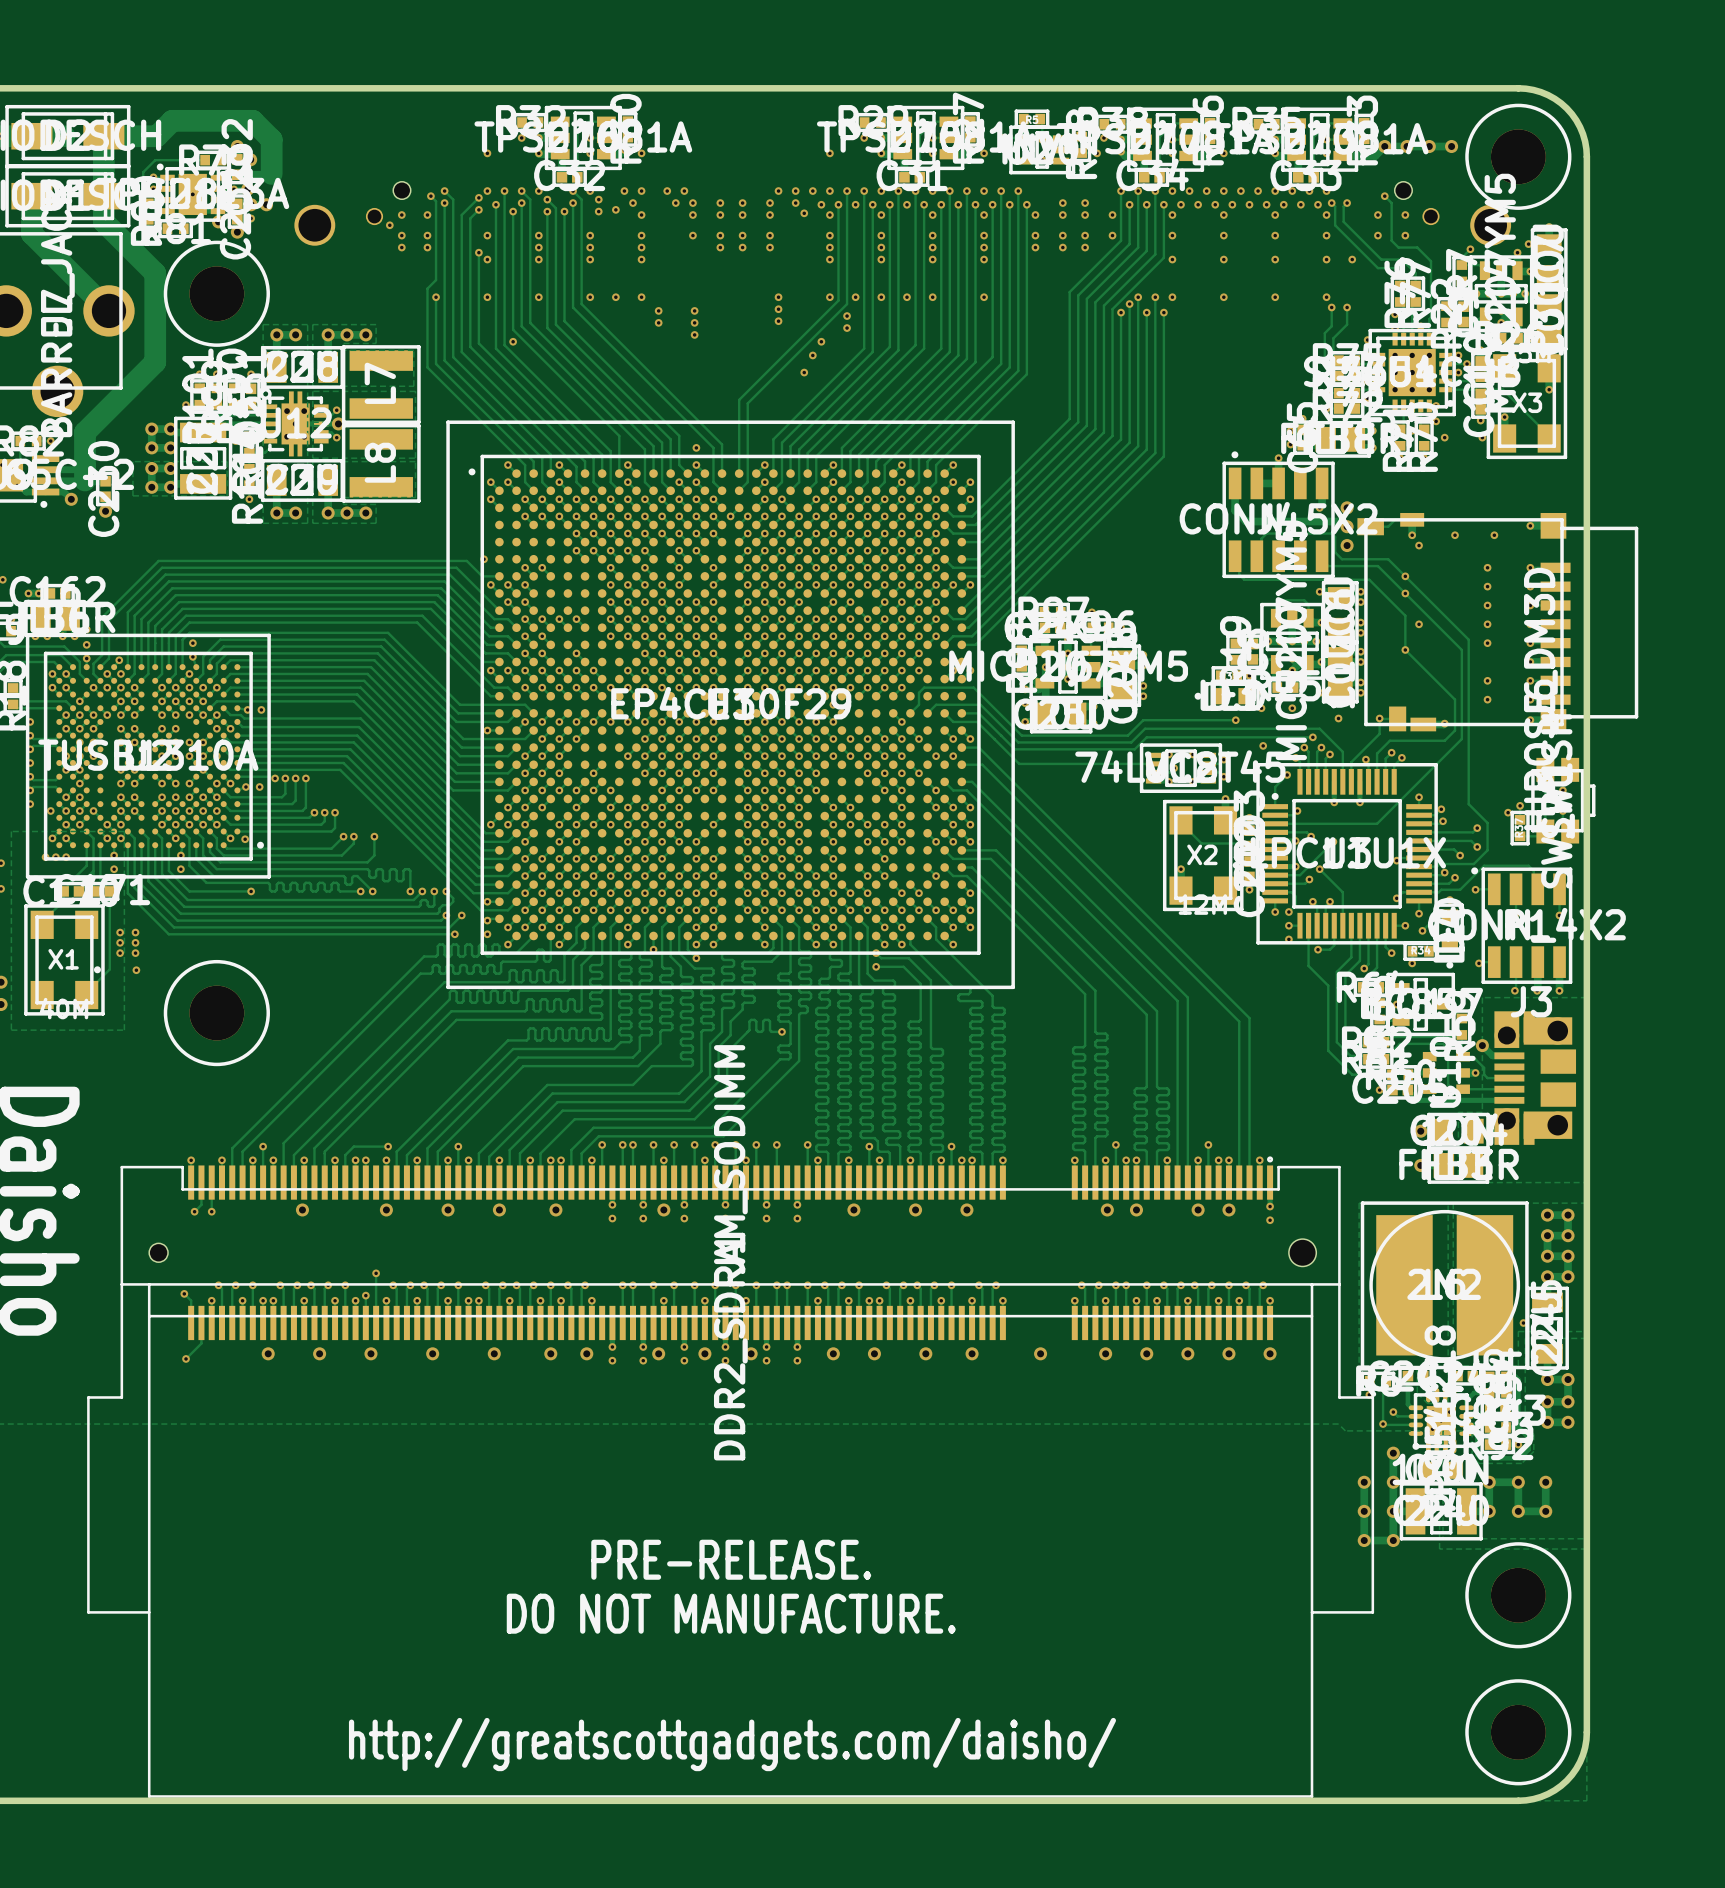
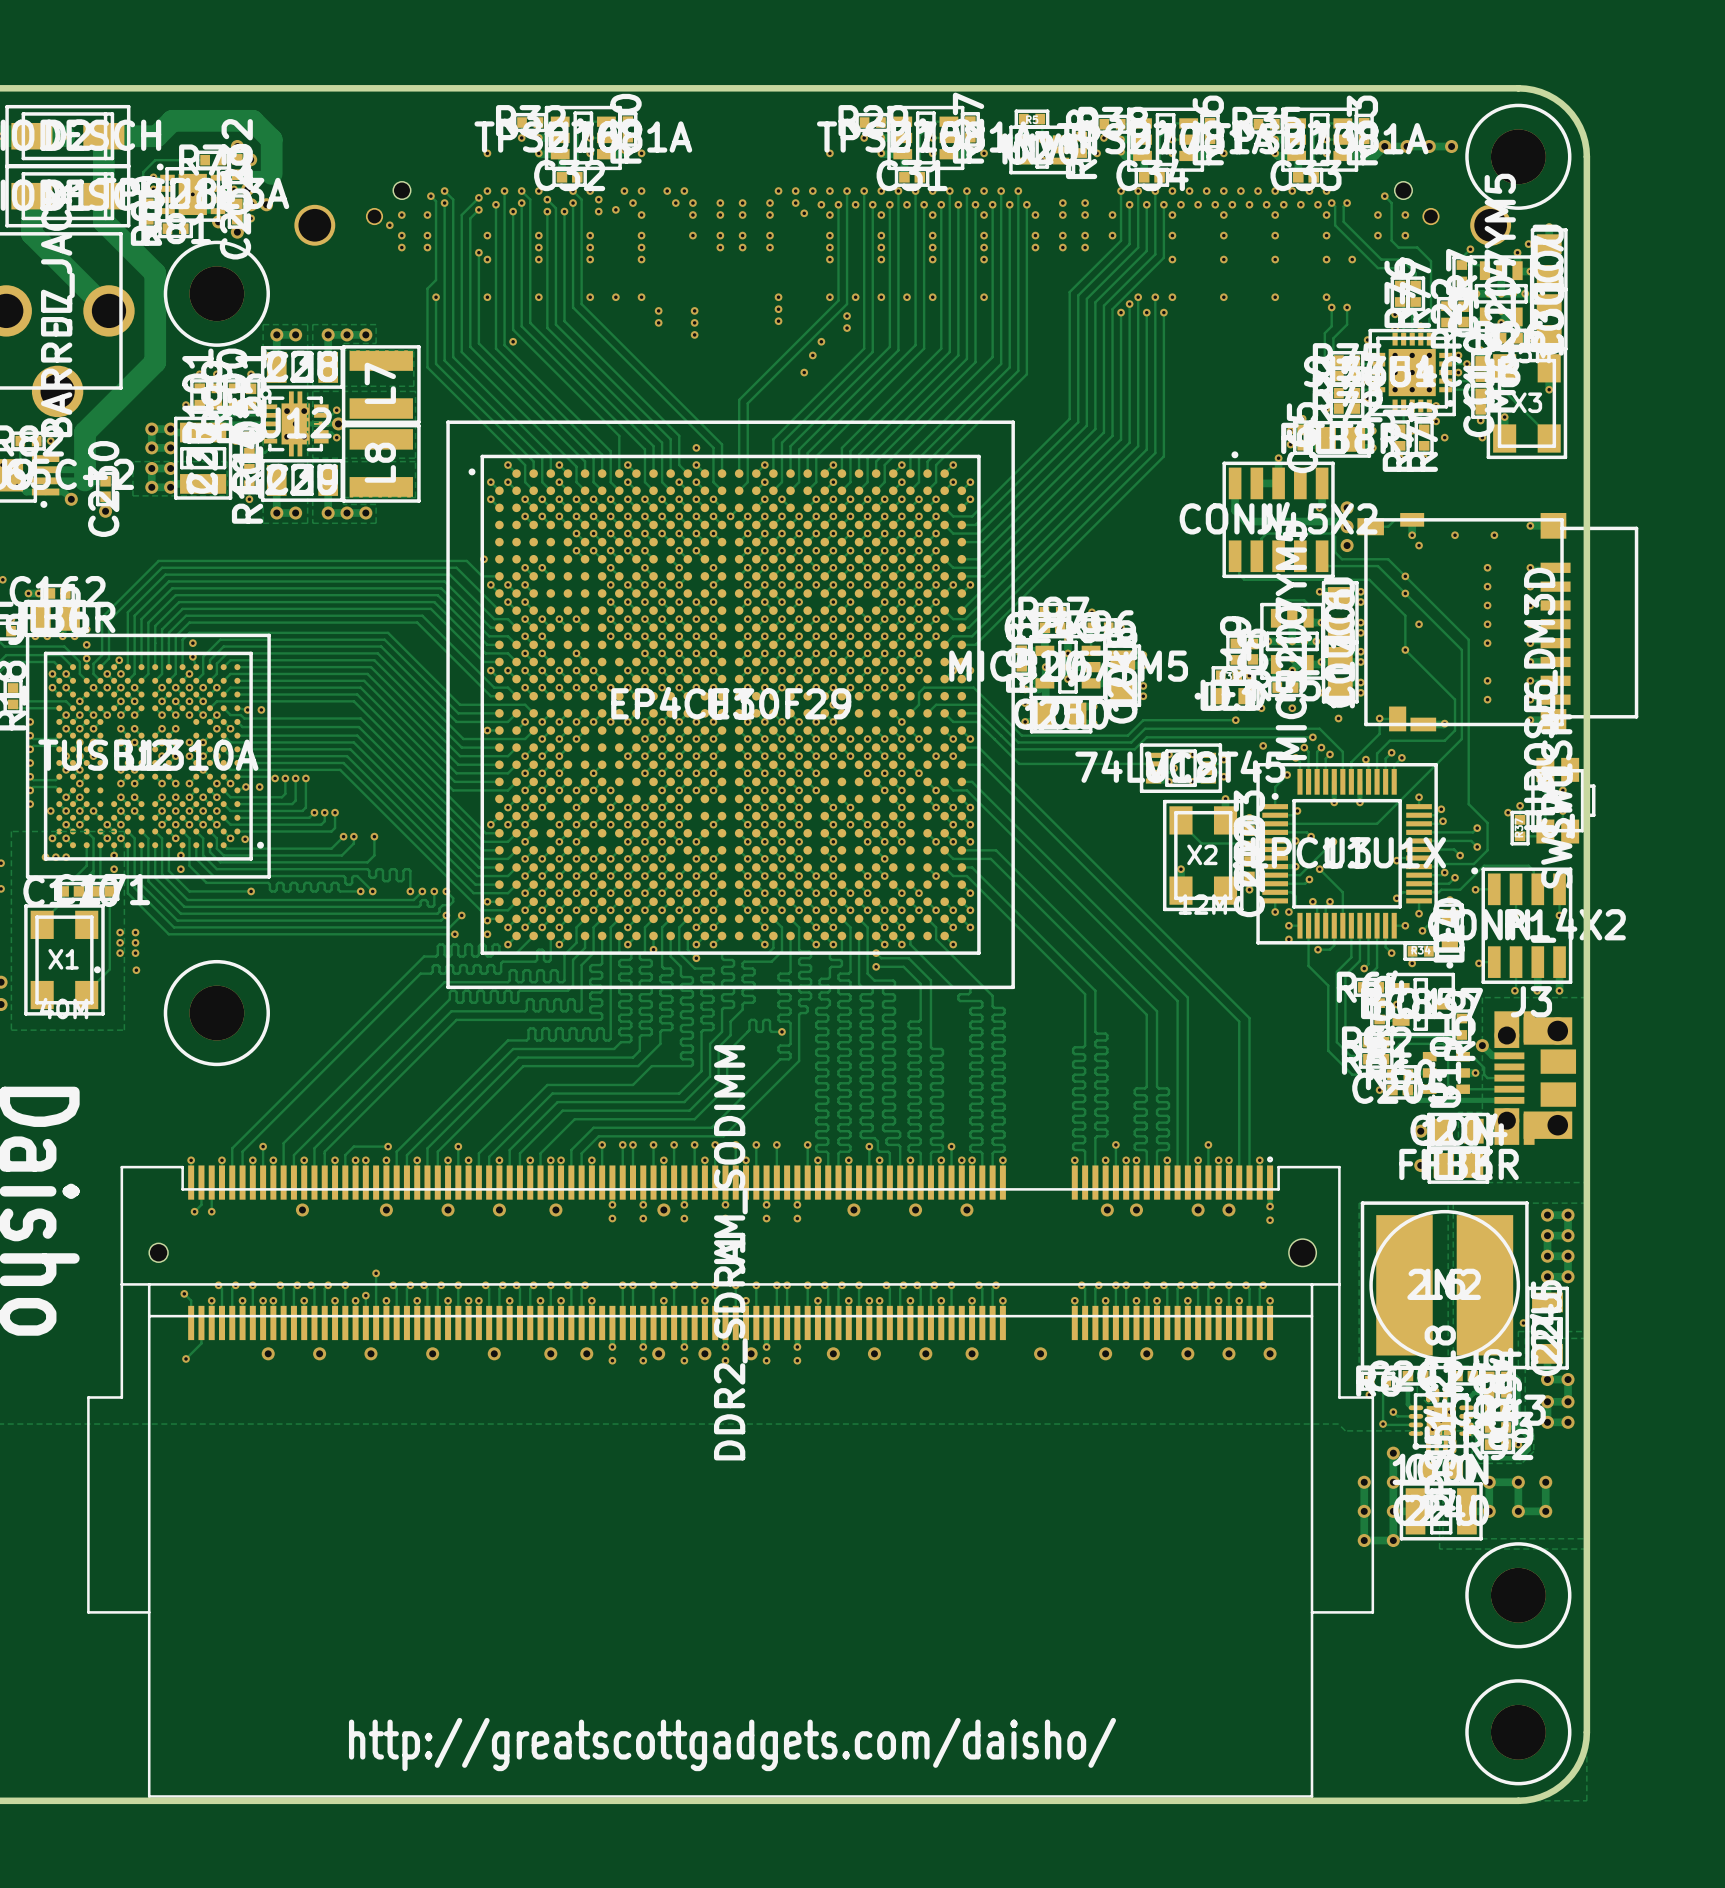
text: PRE-RELEASE. (731, 1559) -> none
text: DO NOT MANUFACTURE. (731, 1613) -> none

